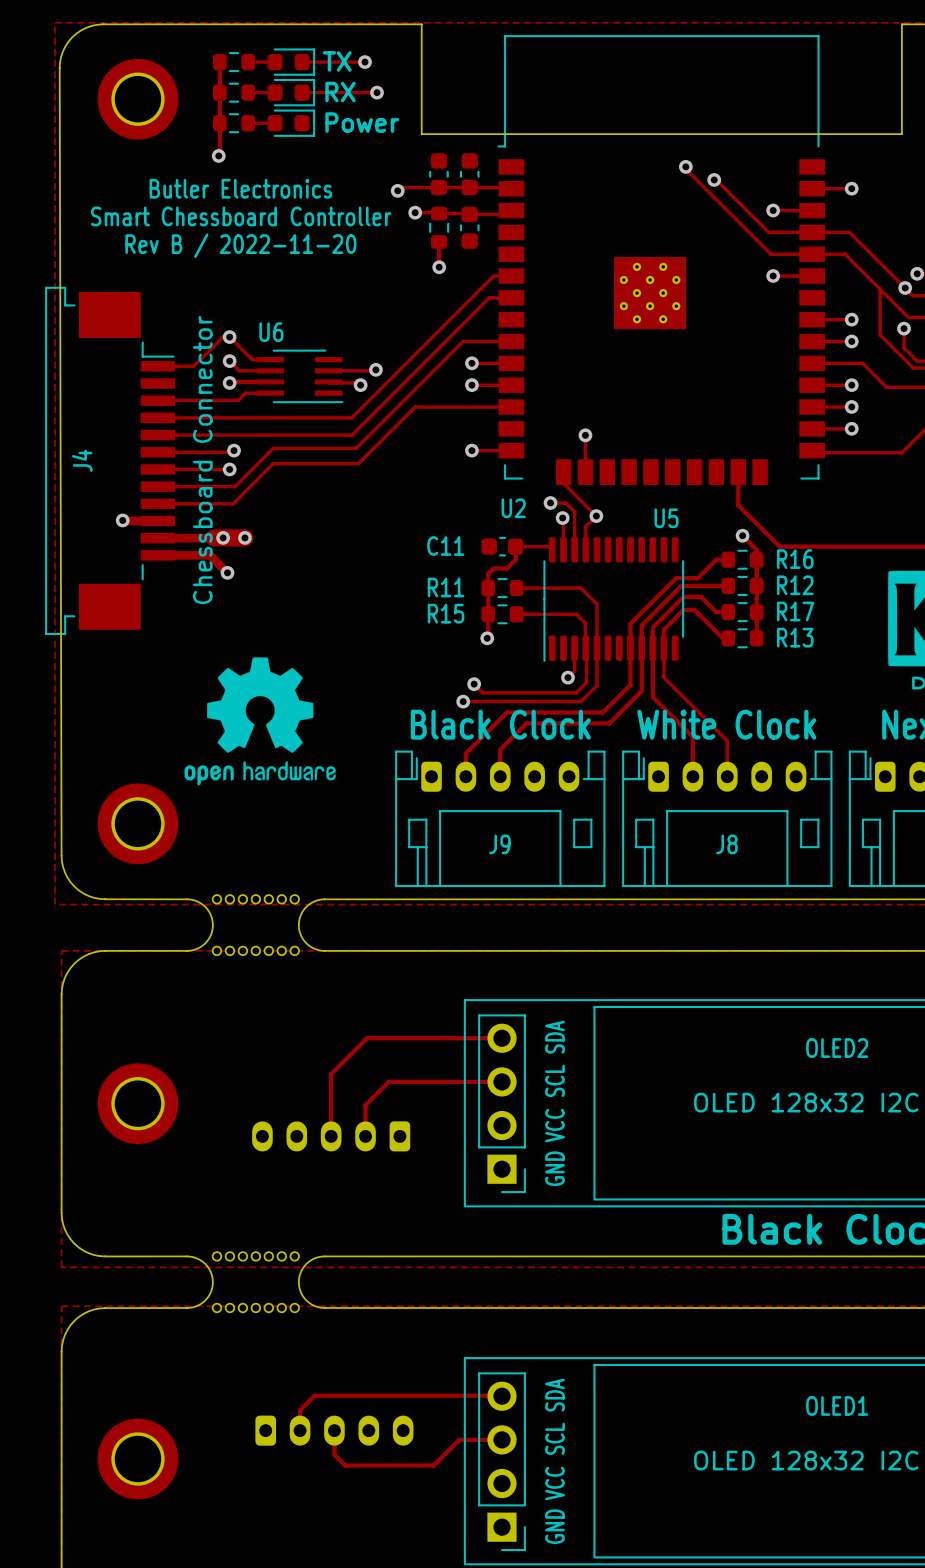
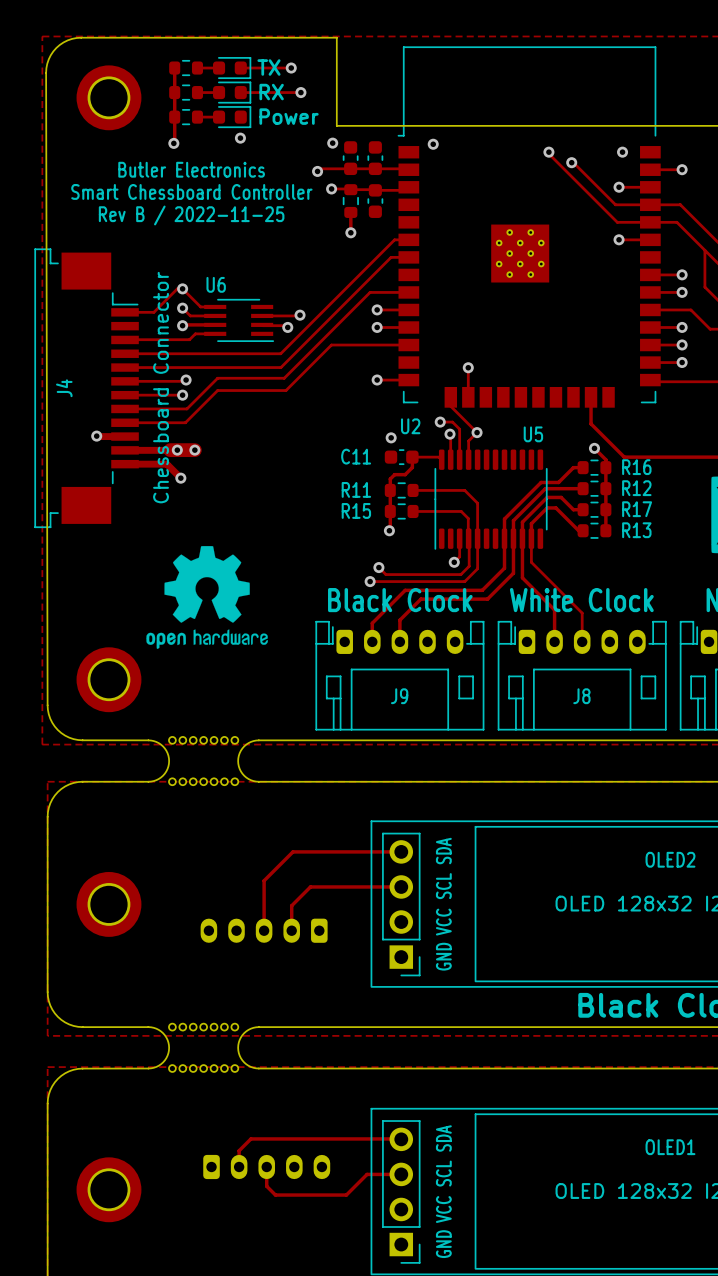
via: none -> (240, 138)
via: none -> (332, 143)
via: none -> (433, 144)
via: none -> (622, 152)
text: Rev B / 2022-11-20 (240, 245) -> Rev B / 2022-11-25 (191, 215)
via: none -> (391, 437)

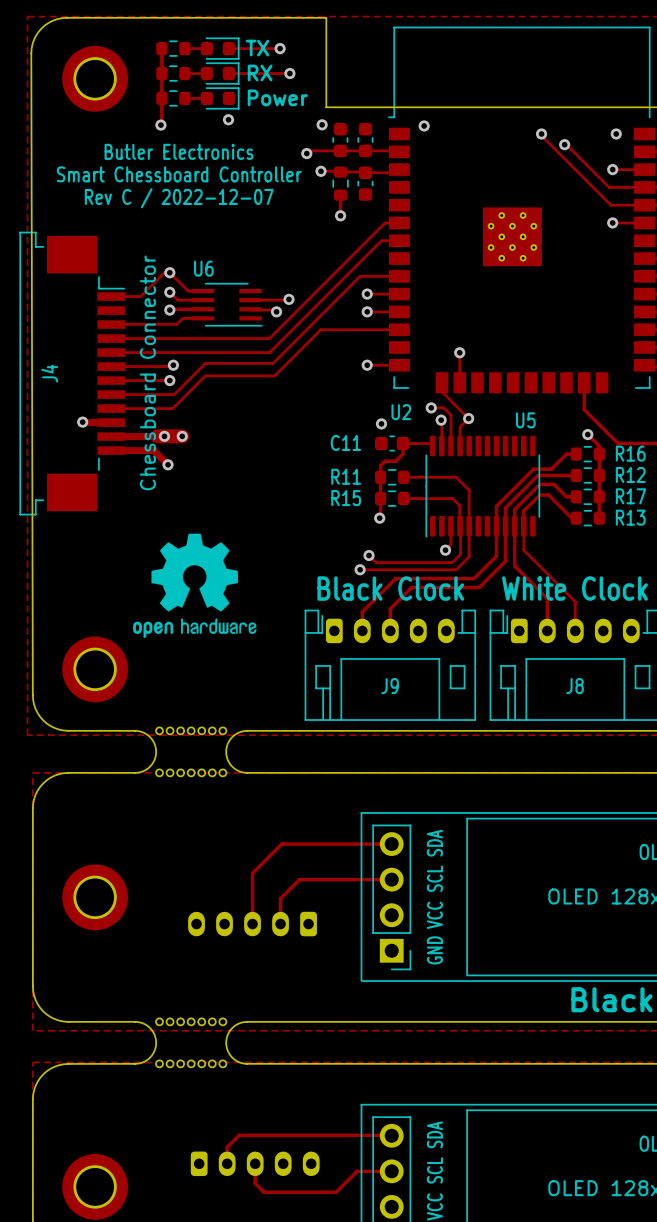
text: Rev B / 2022-11-25 (191, 215) -> Rev C / 2022-12-07 (179, 198)

